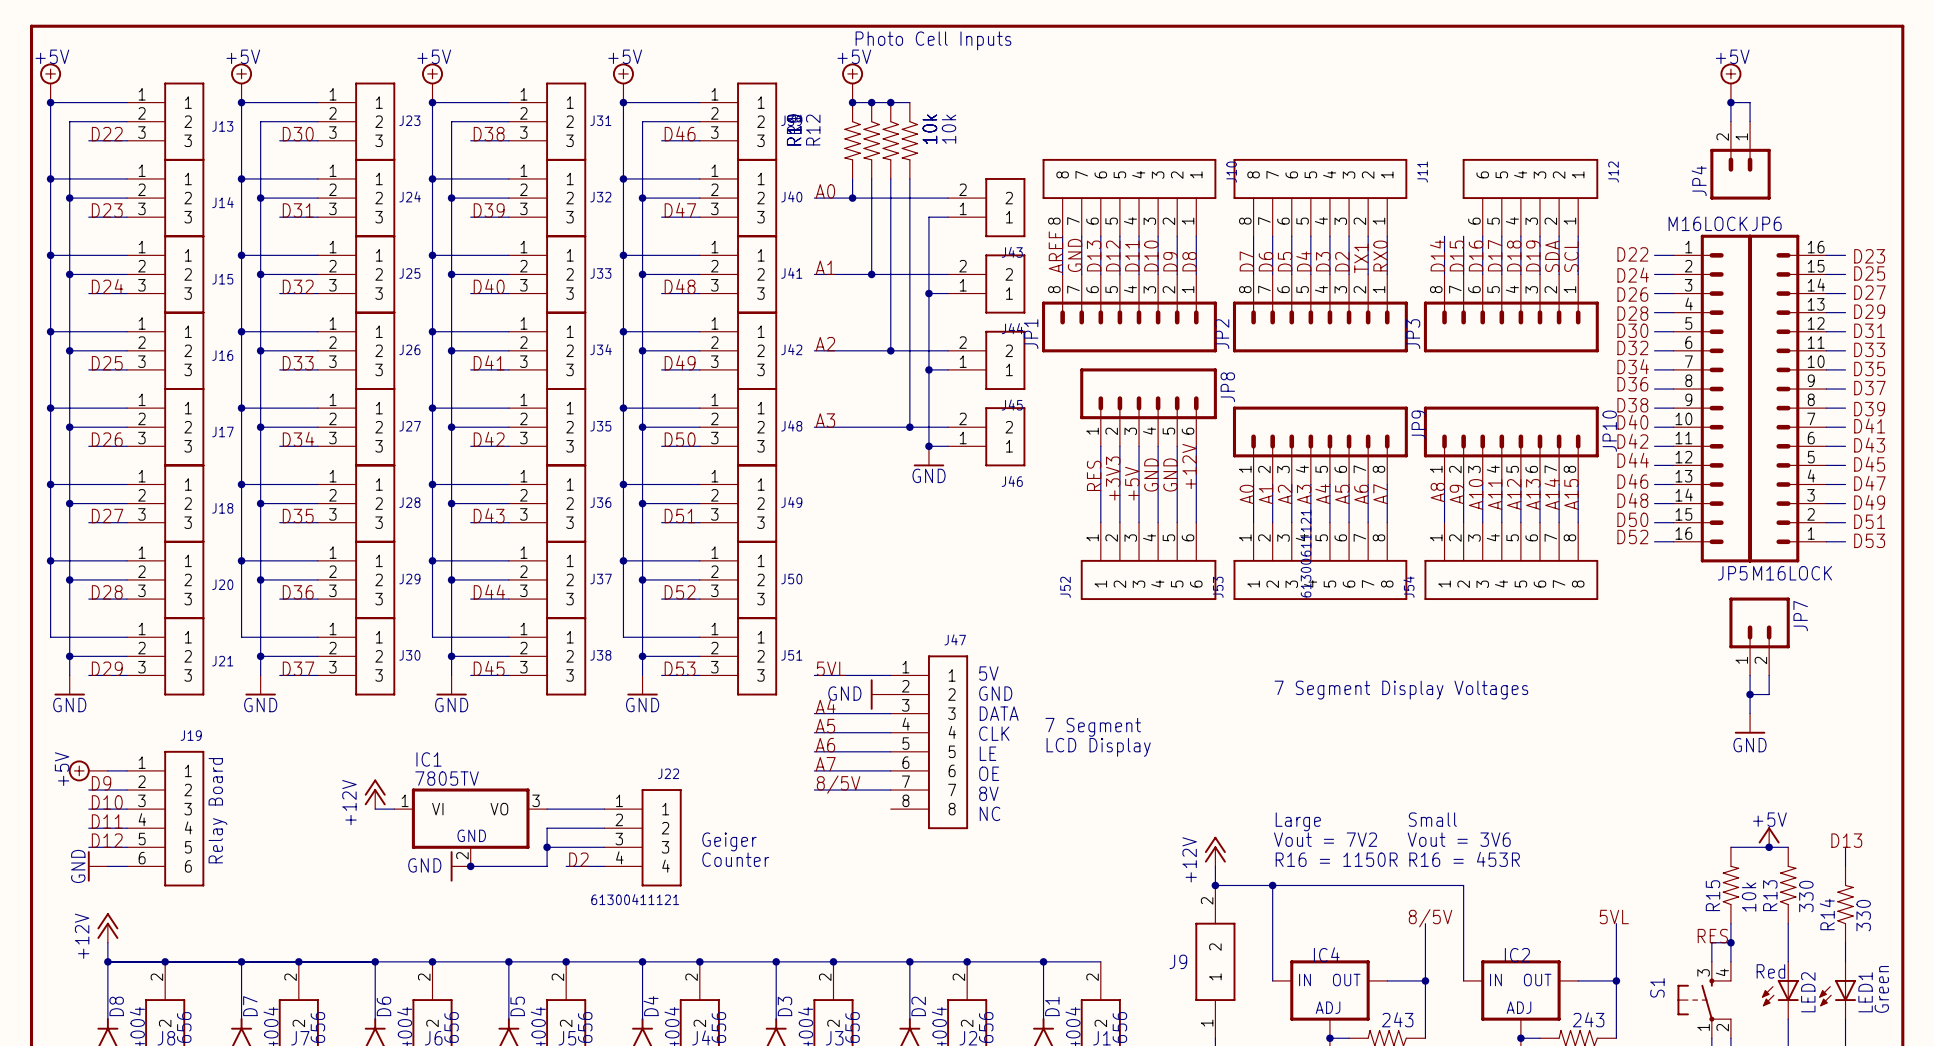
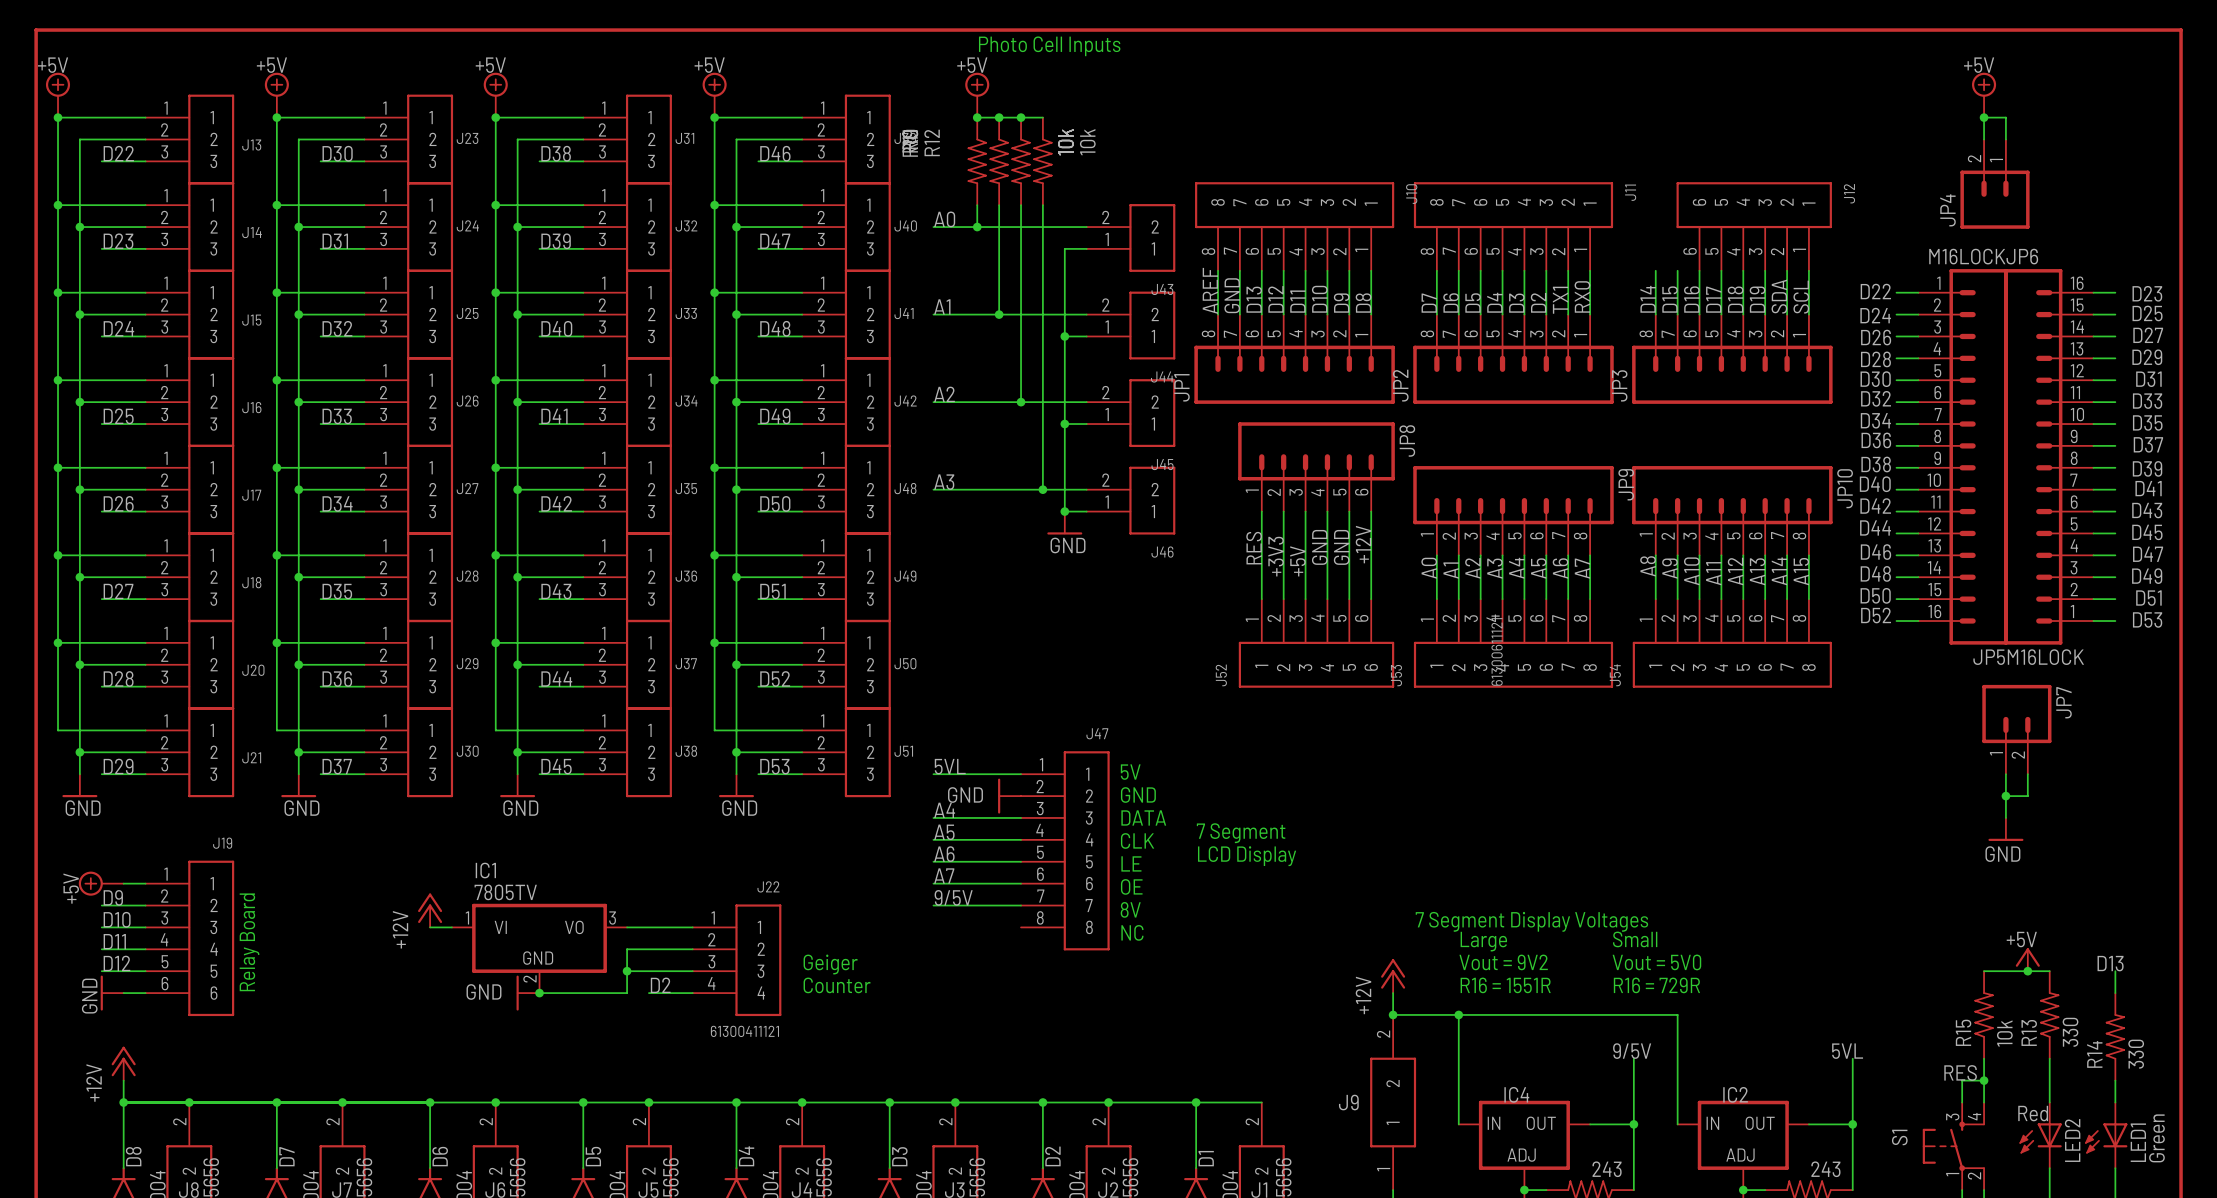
text position: 7 Segment Display Voltages (1401, 690) -> 7 Segment Display Voltages (1531, 921)
label: 8/5V (838, 784) -> 9/5V (953, 897)
text: Vout = 7V2 (1325, 839) -> Vout = 9V2 (1503, 962)
text: Vout = 3V6 (1459, 839) -> Vout = 5V0 (1656, 962)
text: R16 = 1150R (1336, 859) -> R16 = 1551R (1505, 985)
text: R16 = 453R (1464, 859) -> R16 = 729R (1656, 985)
label: 8/5V (1430, 918) -> 9/5V (1632, 1051)

